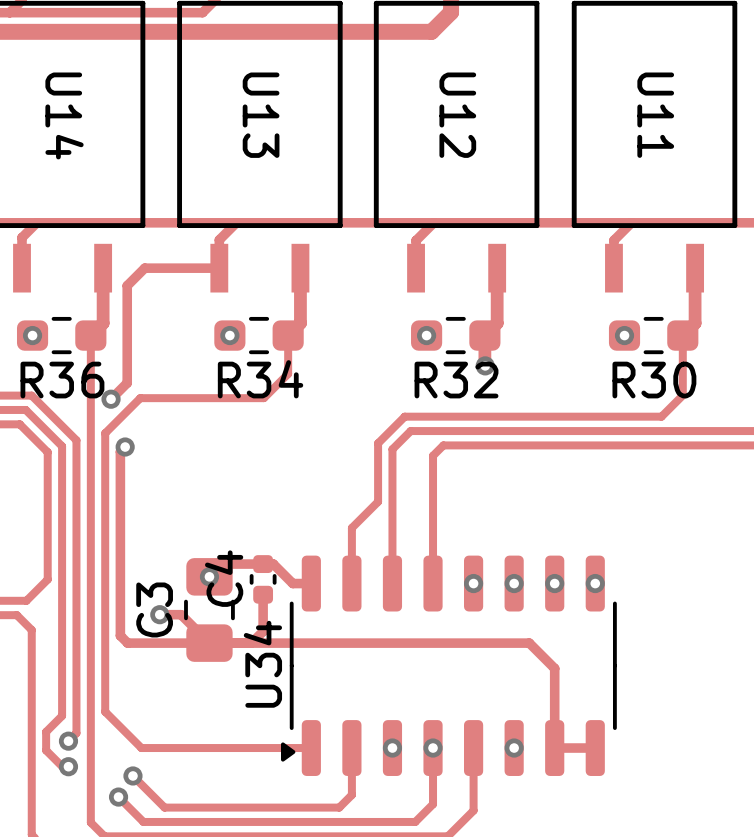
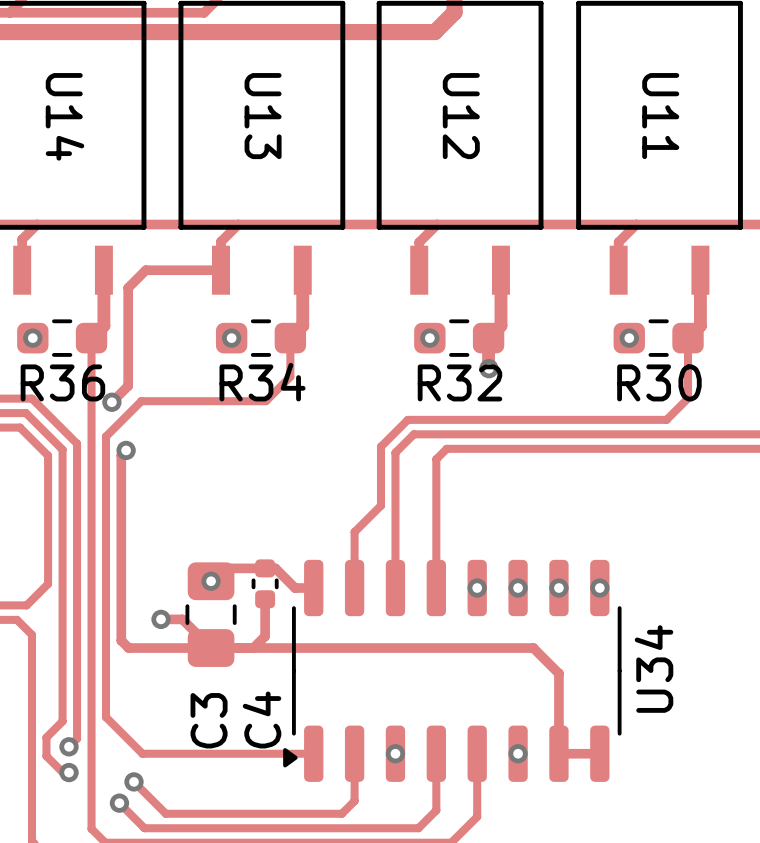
C4 name position: C4 (224, 578) -> C4 (262, 719)
C3 name position: C3 (154, 609) -> C3 (209, 720)
U34 name position: U34 (262, 664) -> U34 (654, 669)
via: (433, 748) -> none

